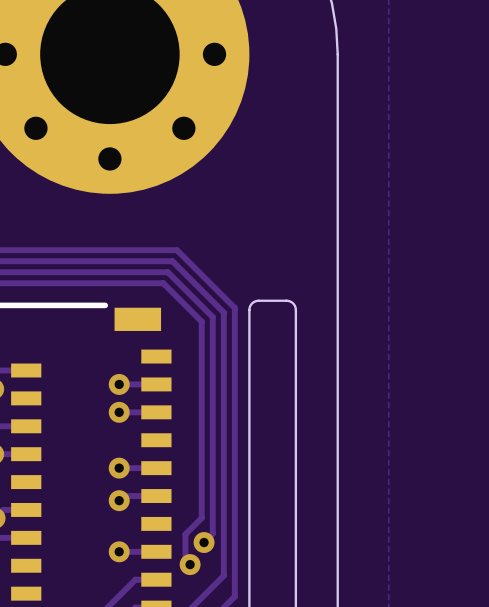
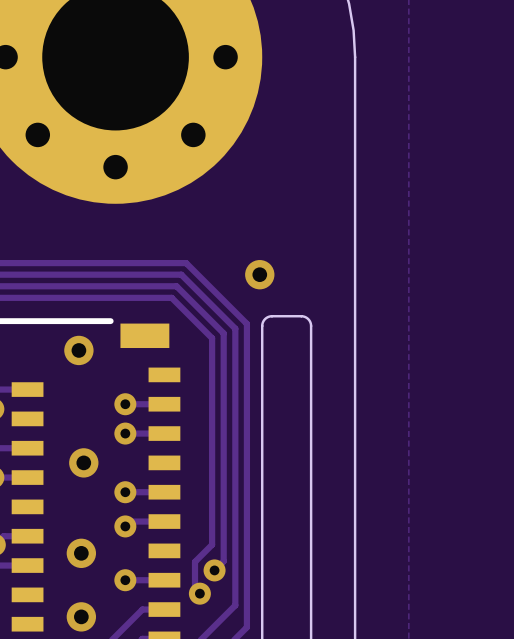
via: none -> (259, 274)
via: none -> (78, 350)
via: none -> (83, 462)
via: none -> (81, 553)
via: none -> (81, 616)

